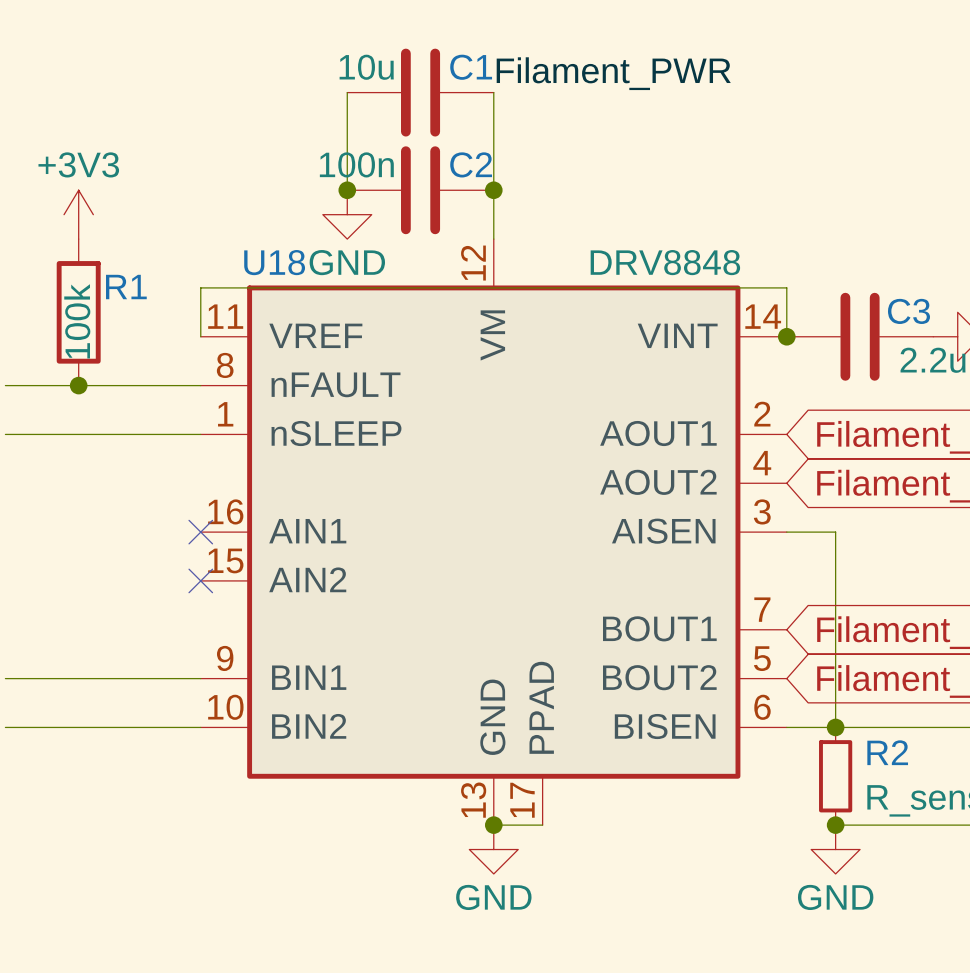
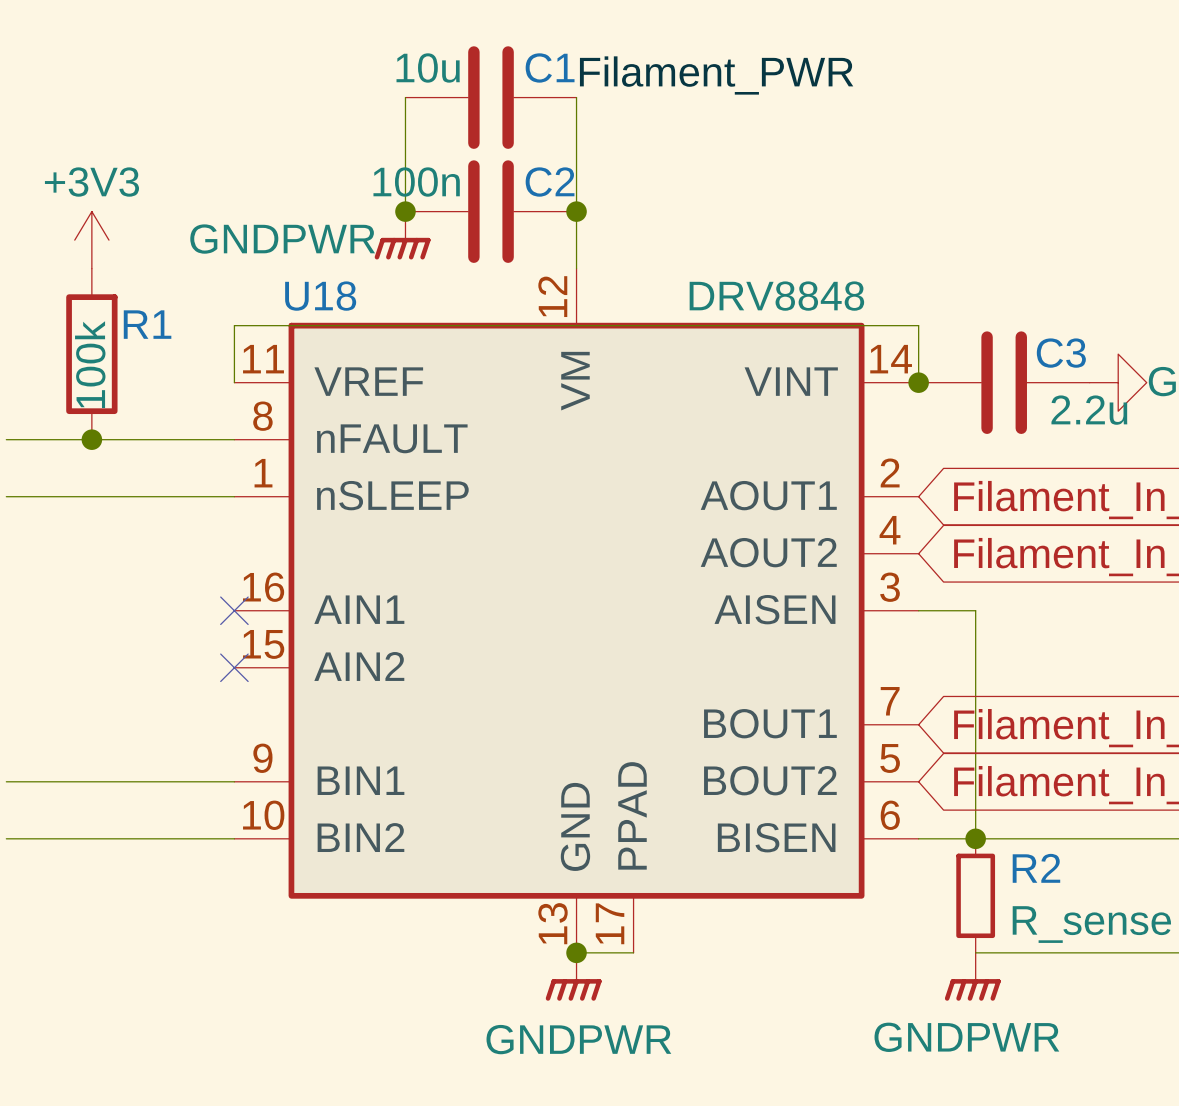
power symbol: GND (347, 214) -> GNDPWR (402, 235)
junction: (835, 825) -> none
power symbol: GND (493, 849) -> GNDPWR (573, 976)
power symbol: GND (835, 849) -> GNDPWR (972, 976)

